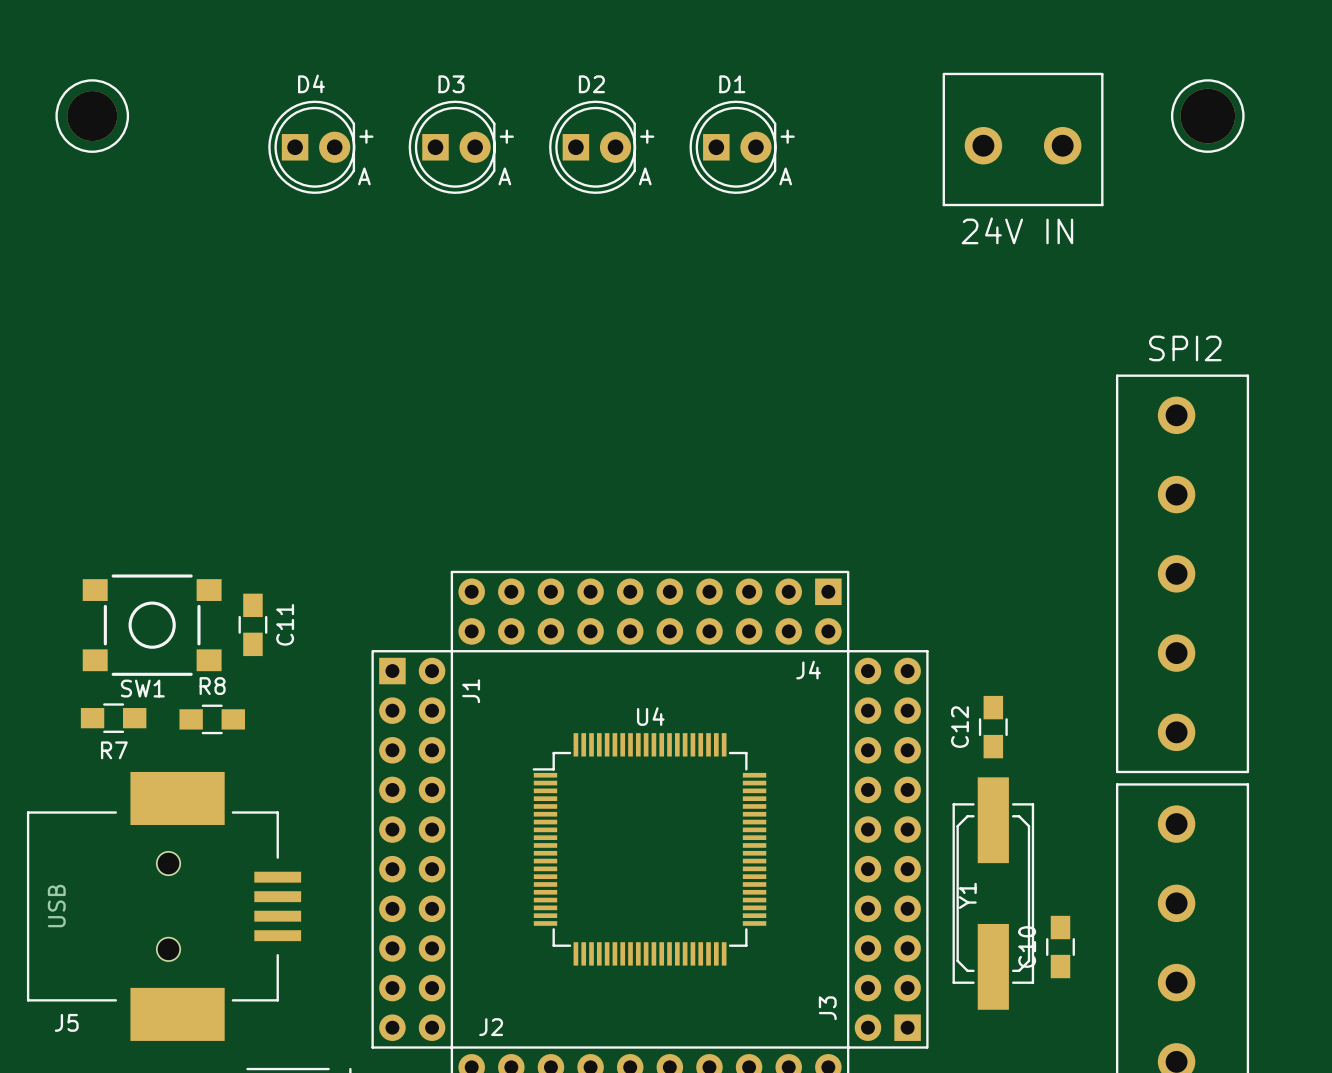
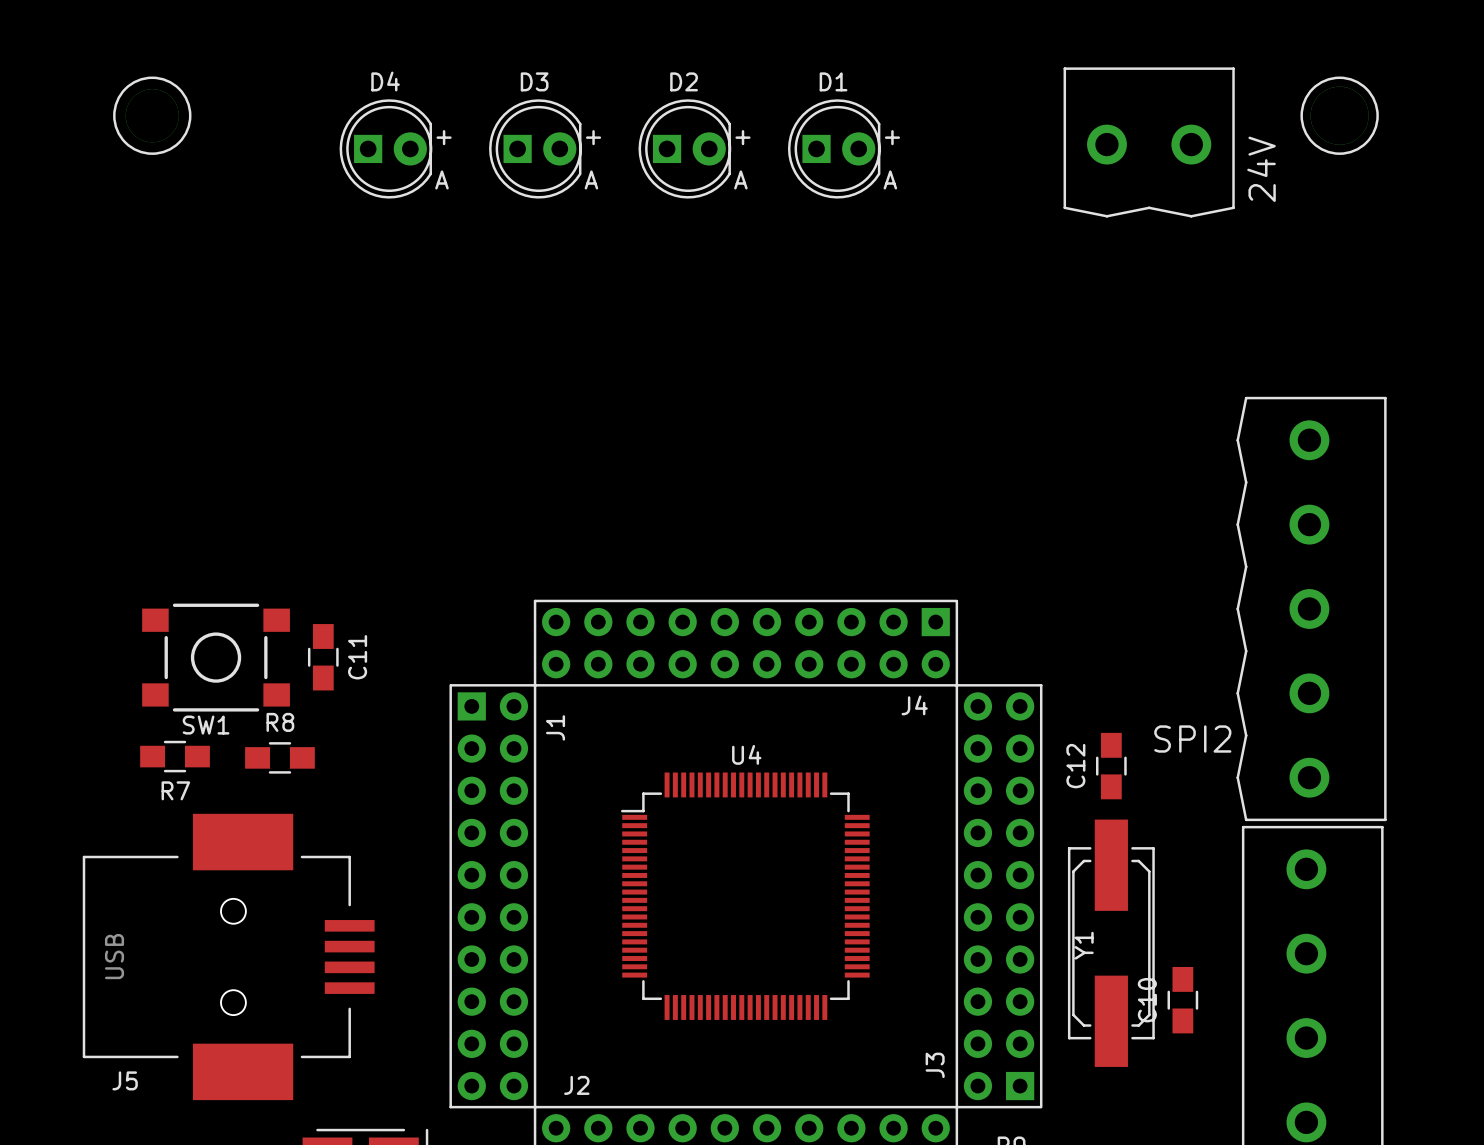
part footprint: [942, 72, 1104, 207] -> [1063, 67, 1235, 218]
part value: 24V IN (1017, 230) -> 24V (1261, 169)
part value position: SPI2 (1185, 348) -> SPI2 (1192, 739)
part footprint: [1115, 374, 1250, 774] -> [1236, 396, 1387, 822]

